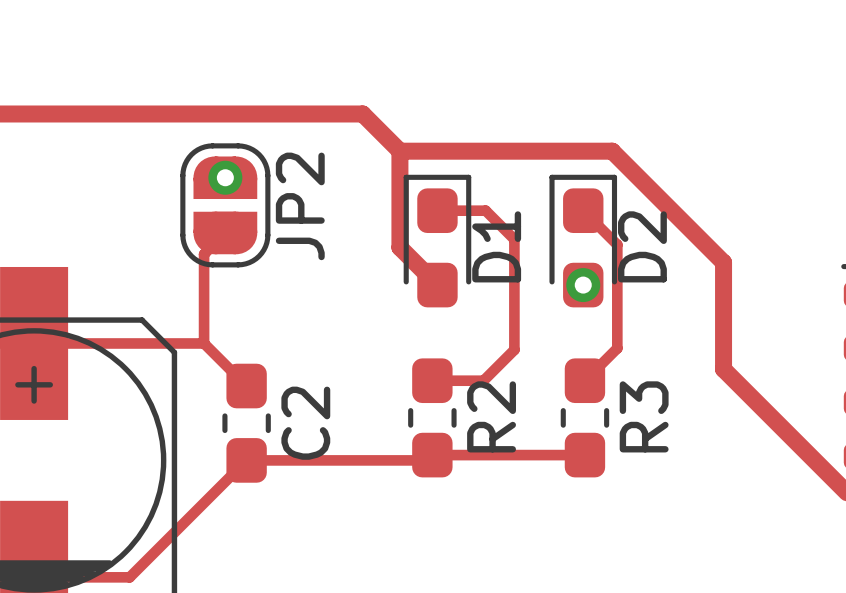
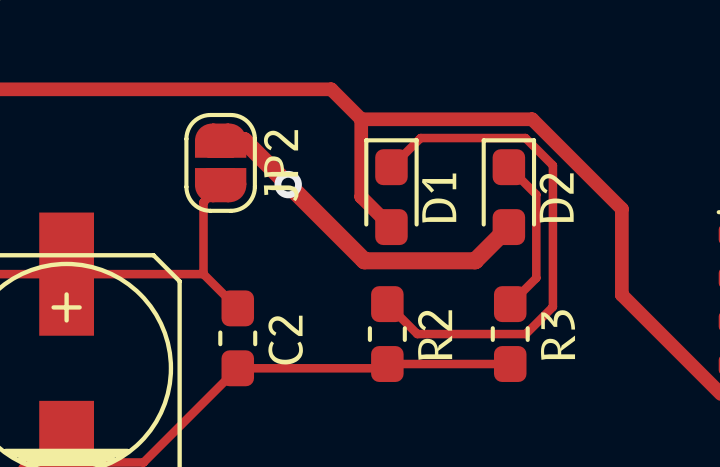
track: none -> (220, 140) (244, 140) (364, 260) (475, 260) (508, 227)
via position: (225, 177) -> (288, 184)
track: (437, 210) (485, 210) (514, 239) (514, 349) (483, 380) (432, 380) -> (391, 167) (420, 138) (525, 138) (552, 165) (552, 306) (525, 334) (417, 334) (387, 304)
via: (583, 285) -> none

